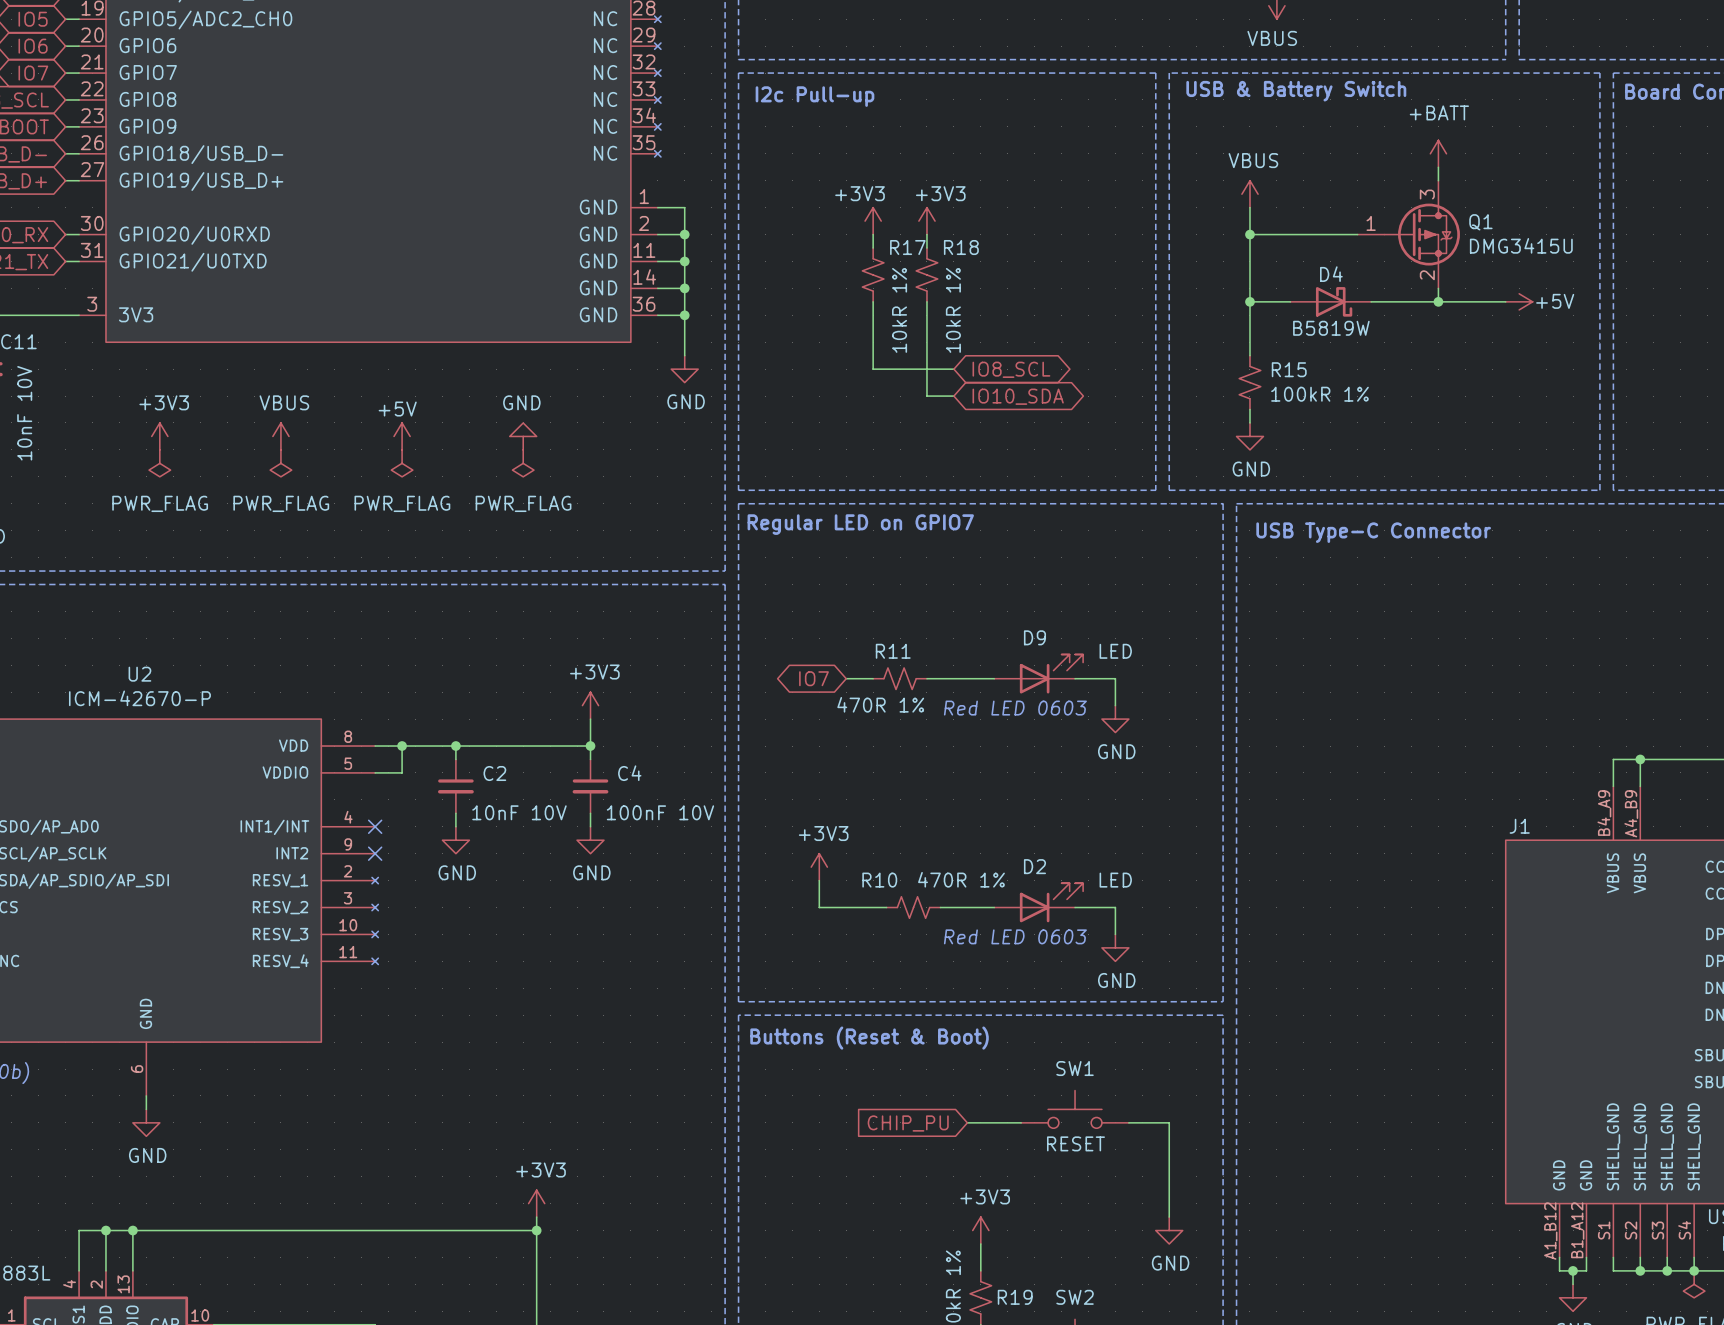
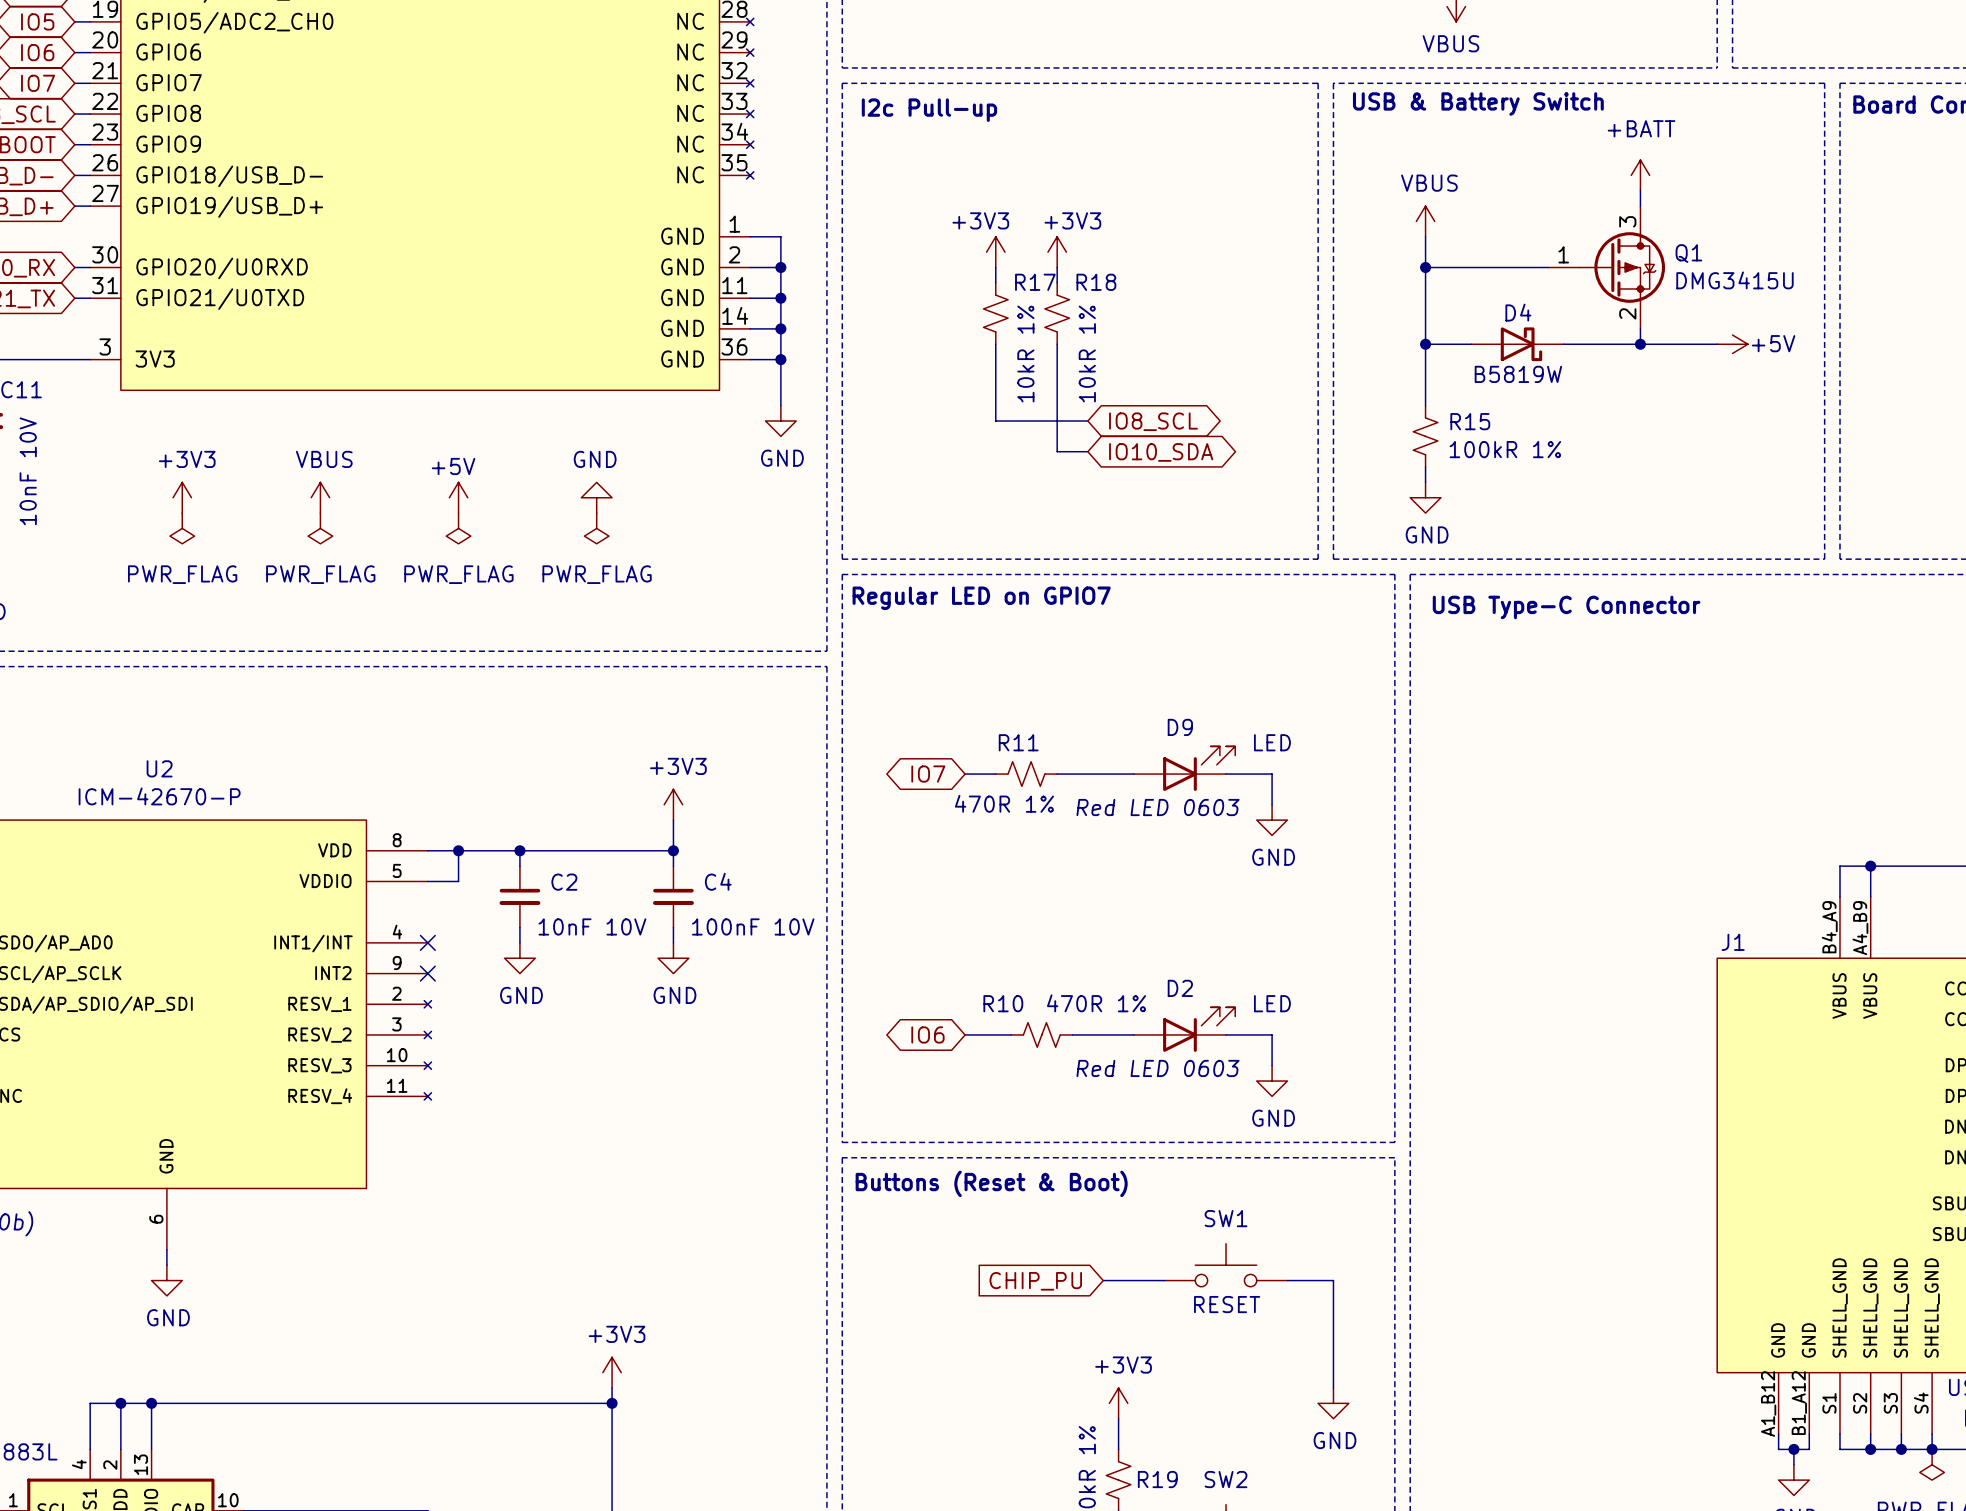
power symbol: +3V3 (819, 867) -> none
wire: (819, 880) (819, 907) (846, 907) -> none
global label: none -> IO6 (927, 1034)

